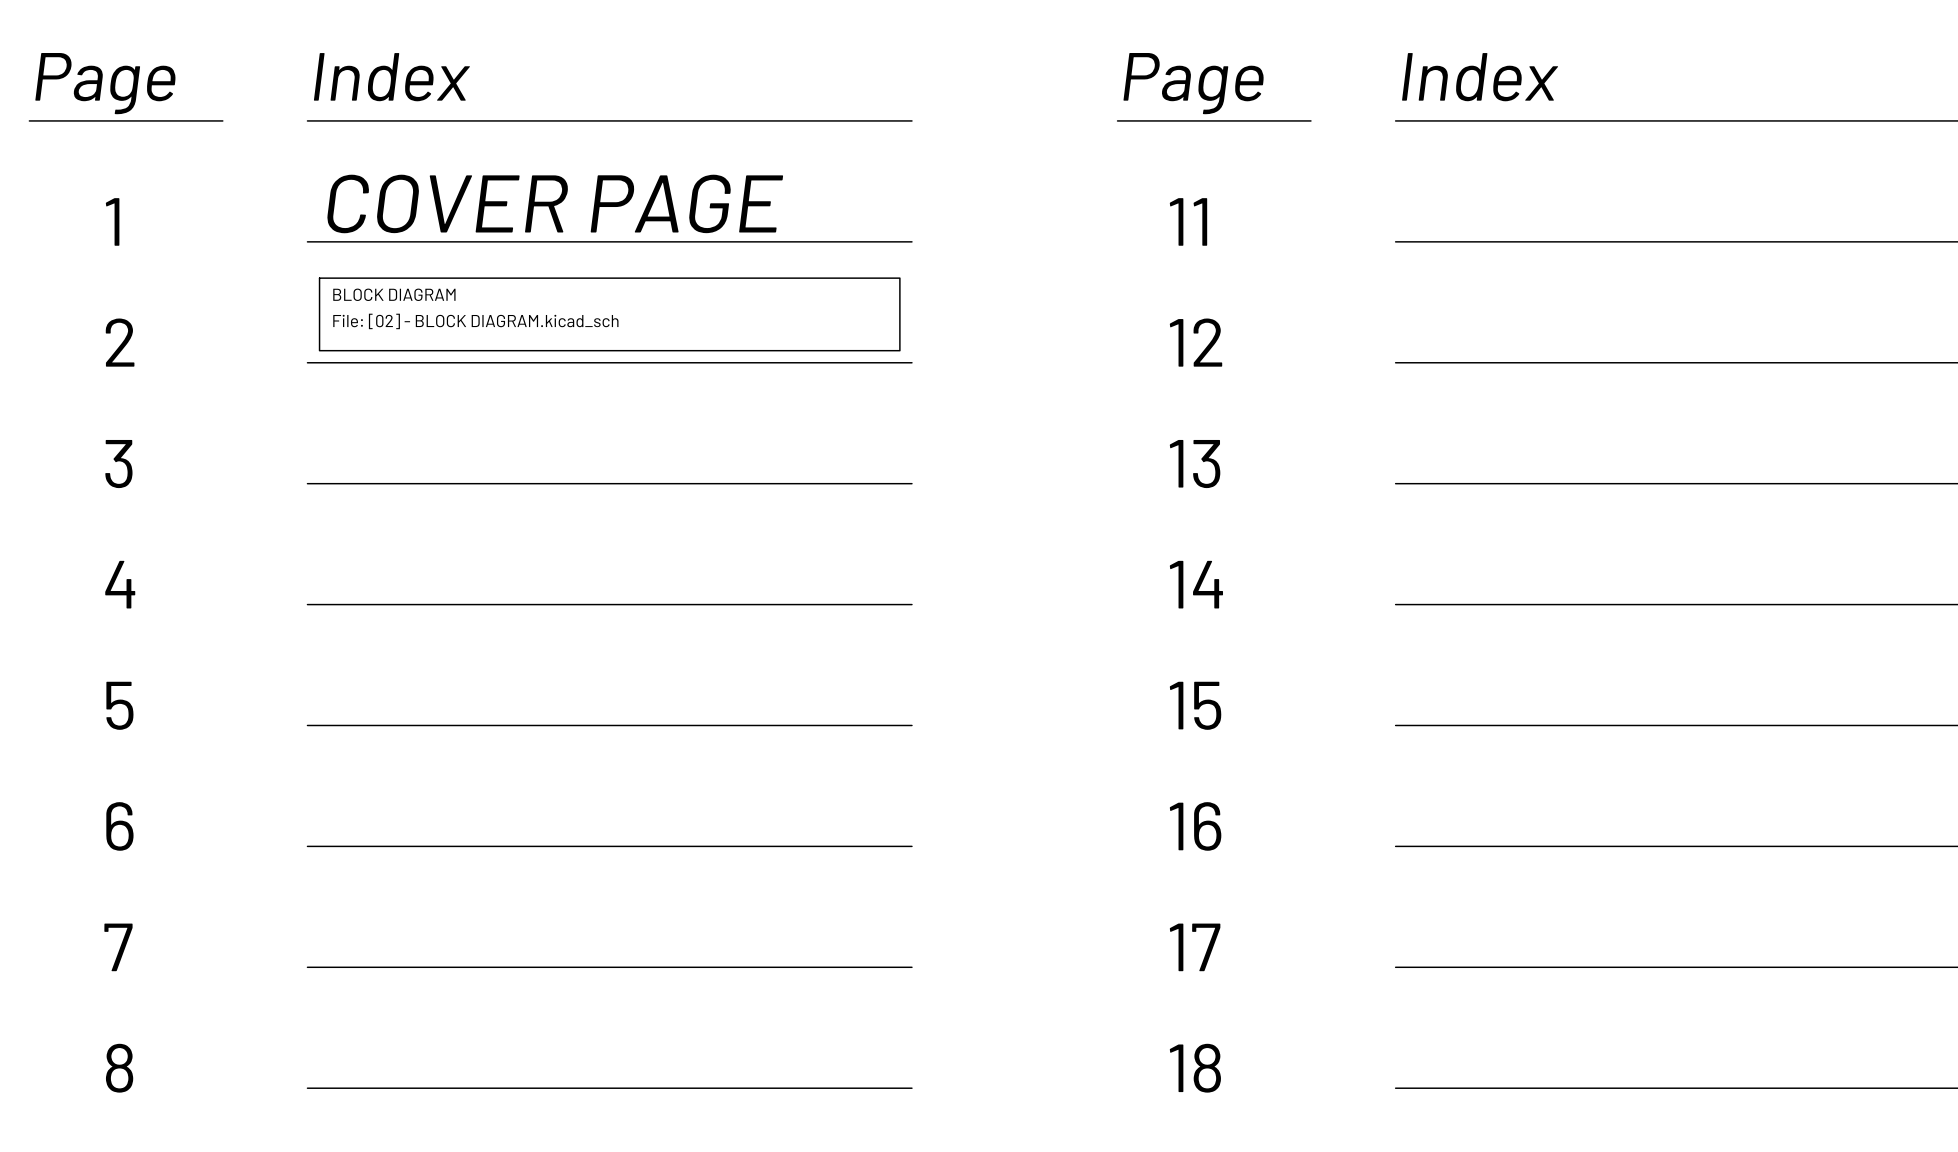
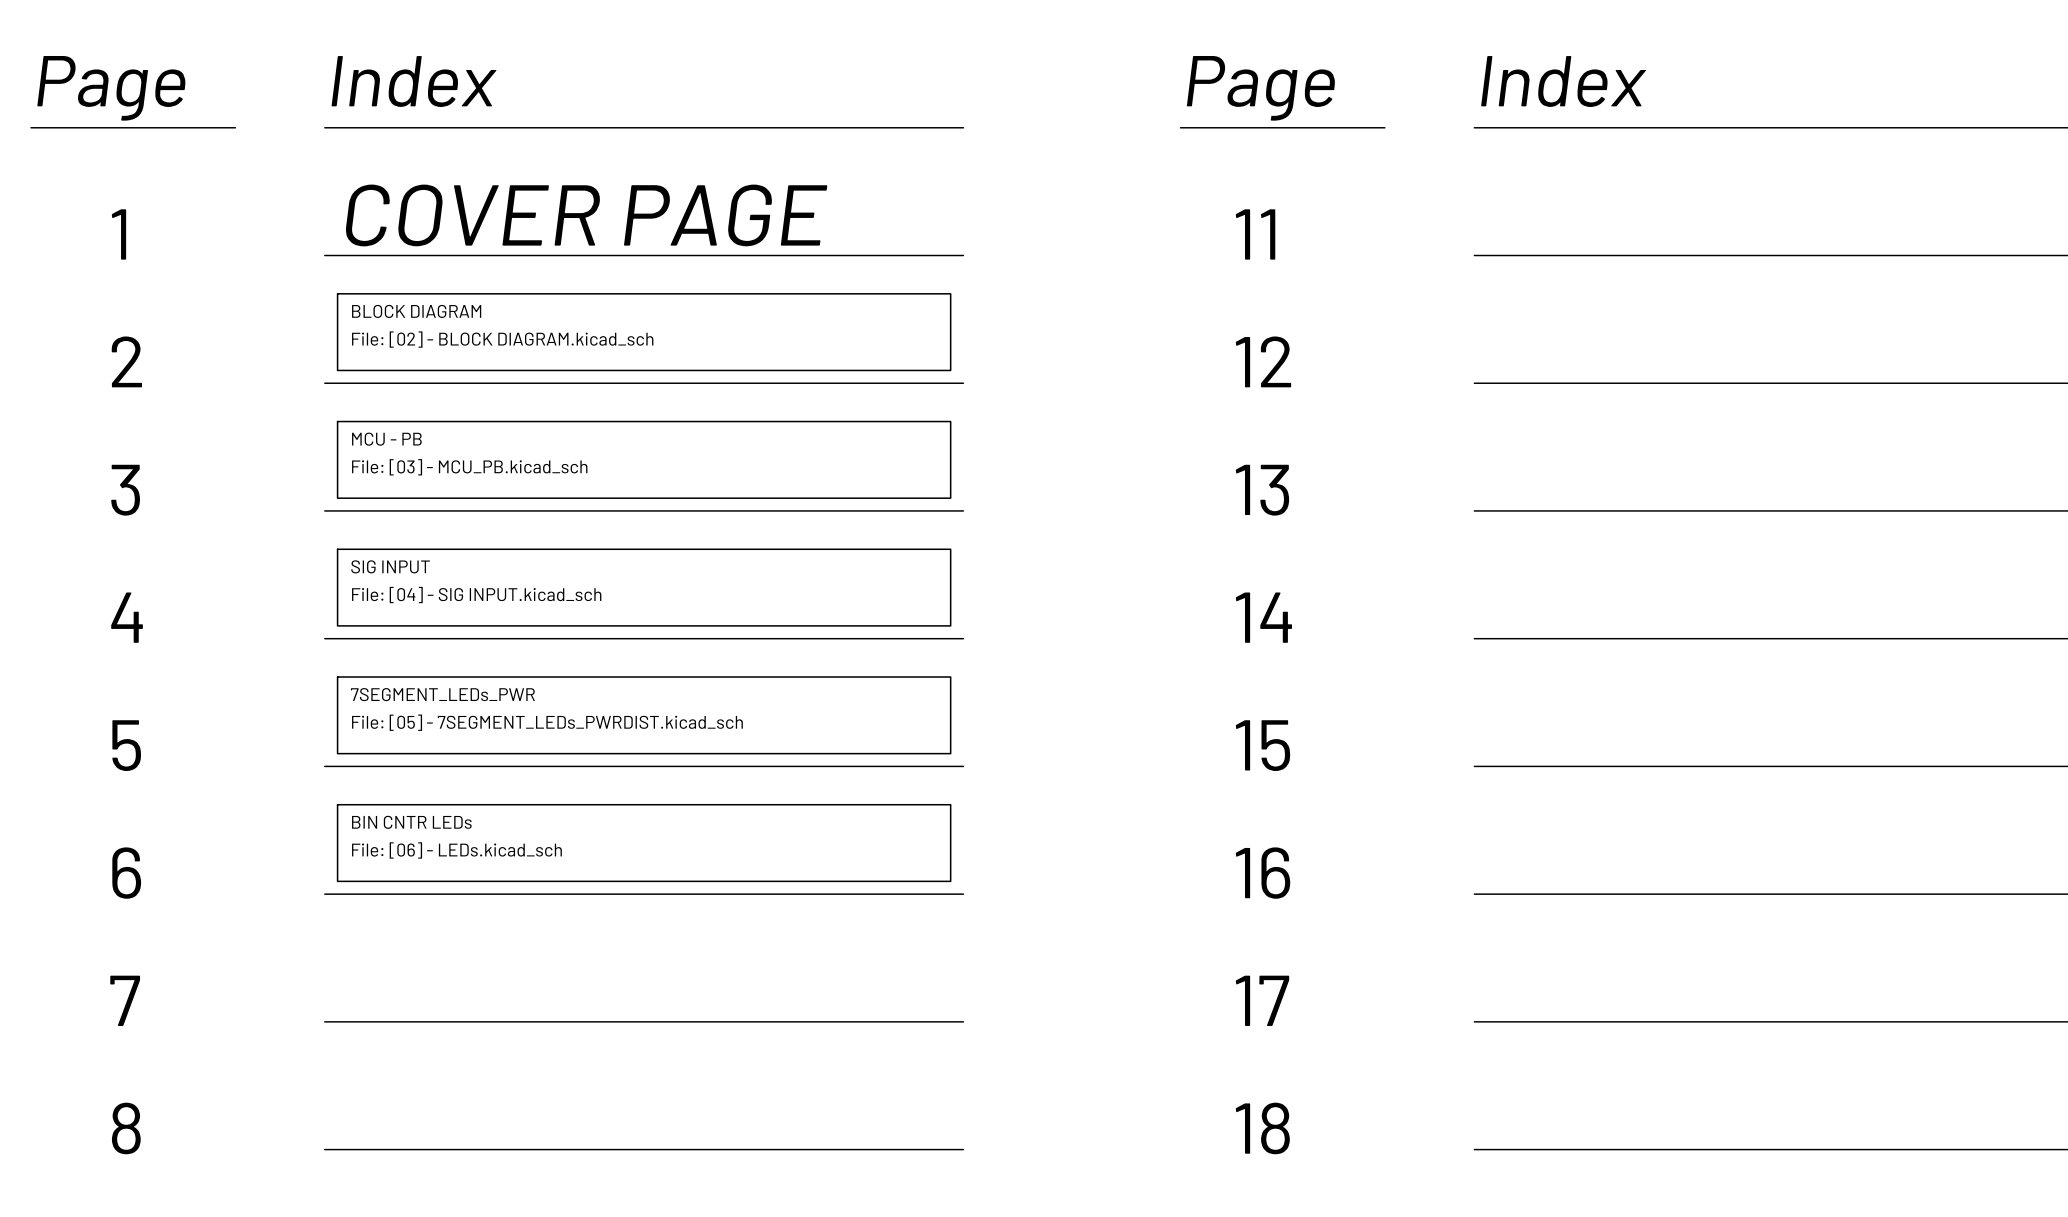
sheet MCU - PB: none -> File: [03] - MCU_PB.kicad_sch (644, 459)
sheet SIG INPUT: none -> File: [04] - SIG INPUT.kicad_sch (644, 587)
sheet 7SEGMENT_LEDs_PWR: none -> File: [05] - 7SEGMENT_LEDs_PWRDIST.kicad_sch (644, 715)
sheet BIN CNTR LEDs: none -> File: [06] - LEDs.kicad_sch (644, 843)

